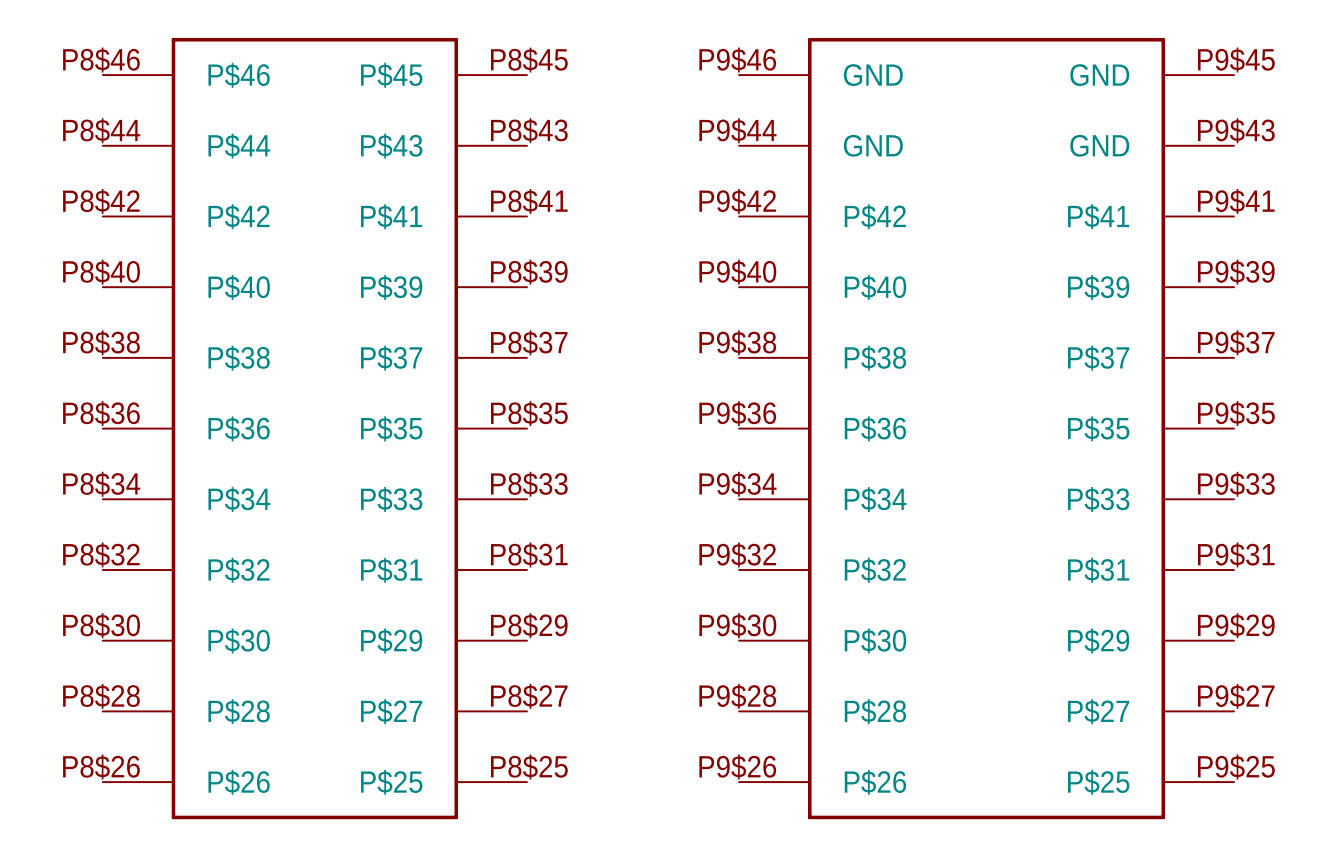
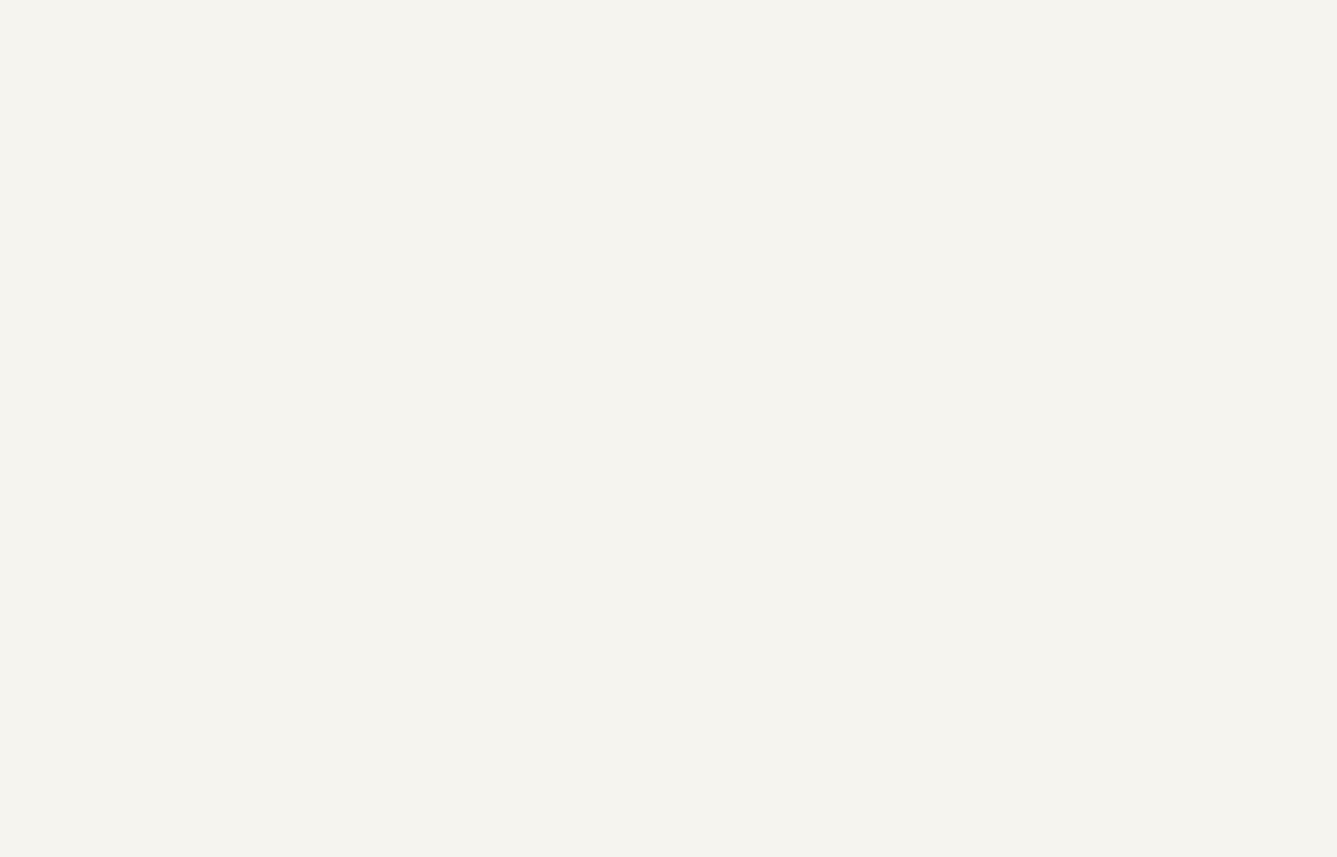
part: (314, 428) -> none
part: (986, 428) -> none

